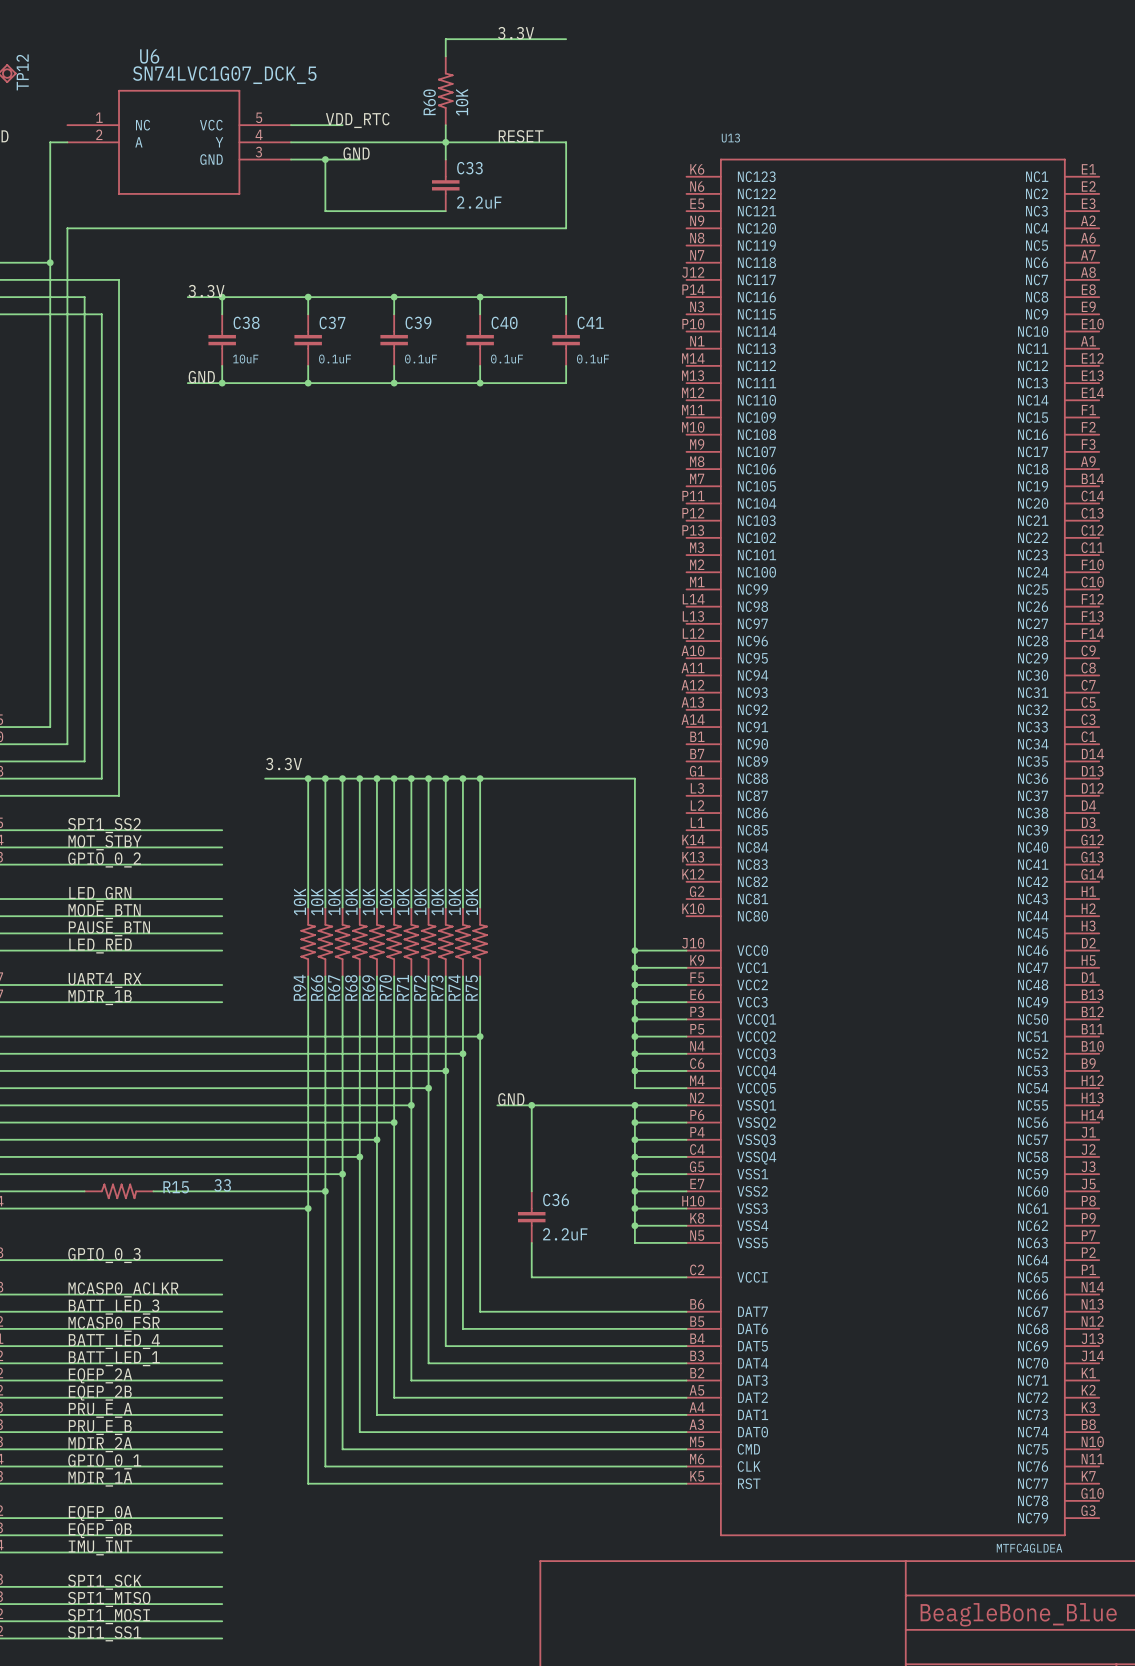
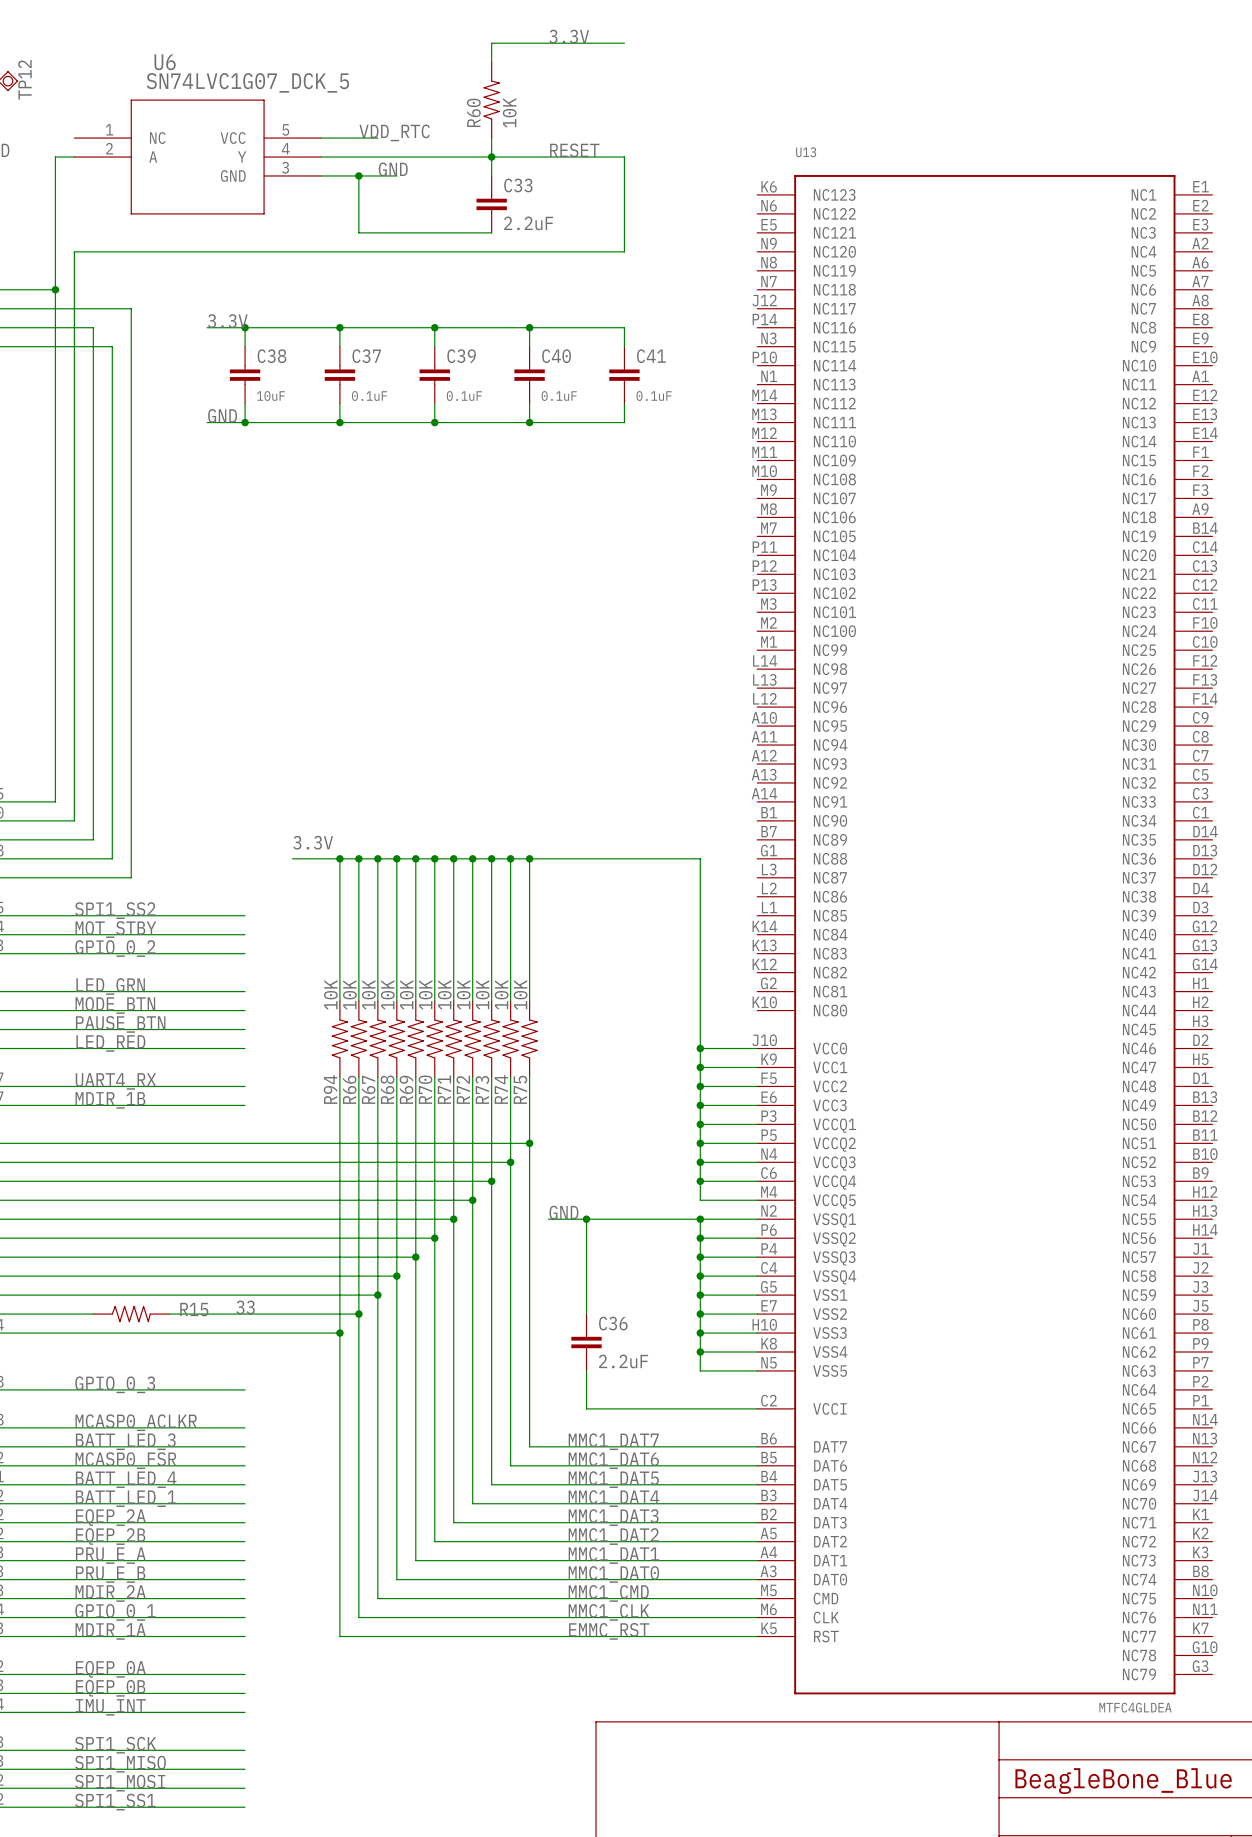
label: none -> MMC1_DAT7 (613, 1441)
label: none -> MMC1_DAT6 (613, 1460)
label: none -> MMC1_DAT5 (613, 1479)
label: none -> MMC1_DAT4 (614, 1498)
label: none -> MMC1_DAT3 (613, 1517)
label: none -> MMC1_DAT2 (613, 1536)
label: none -> MMC1_DAT1 (613, 1555)
label: none -> MMC1_DAT0 (613, 1574)
label: none -> MMC1_CMD (608, 1593)
label: none -> MMC1_CLK (609, 1612)
label: none -> EMMC_RST (609, 1631)

